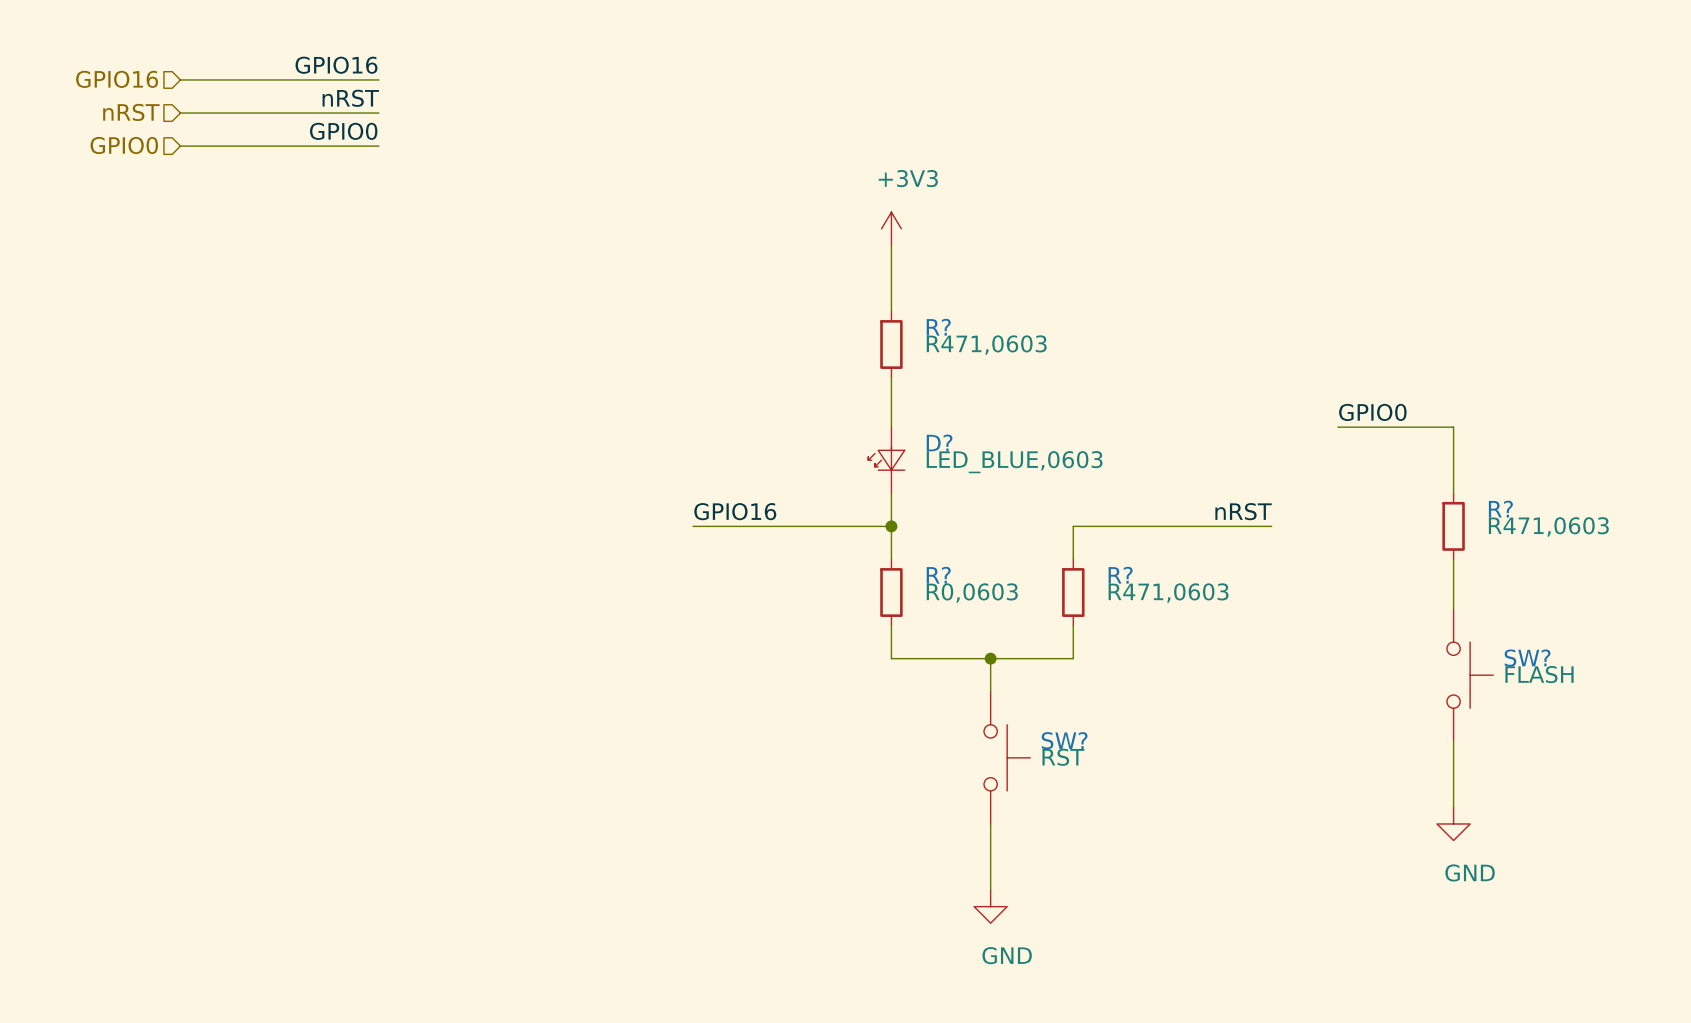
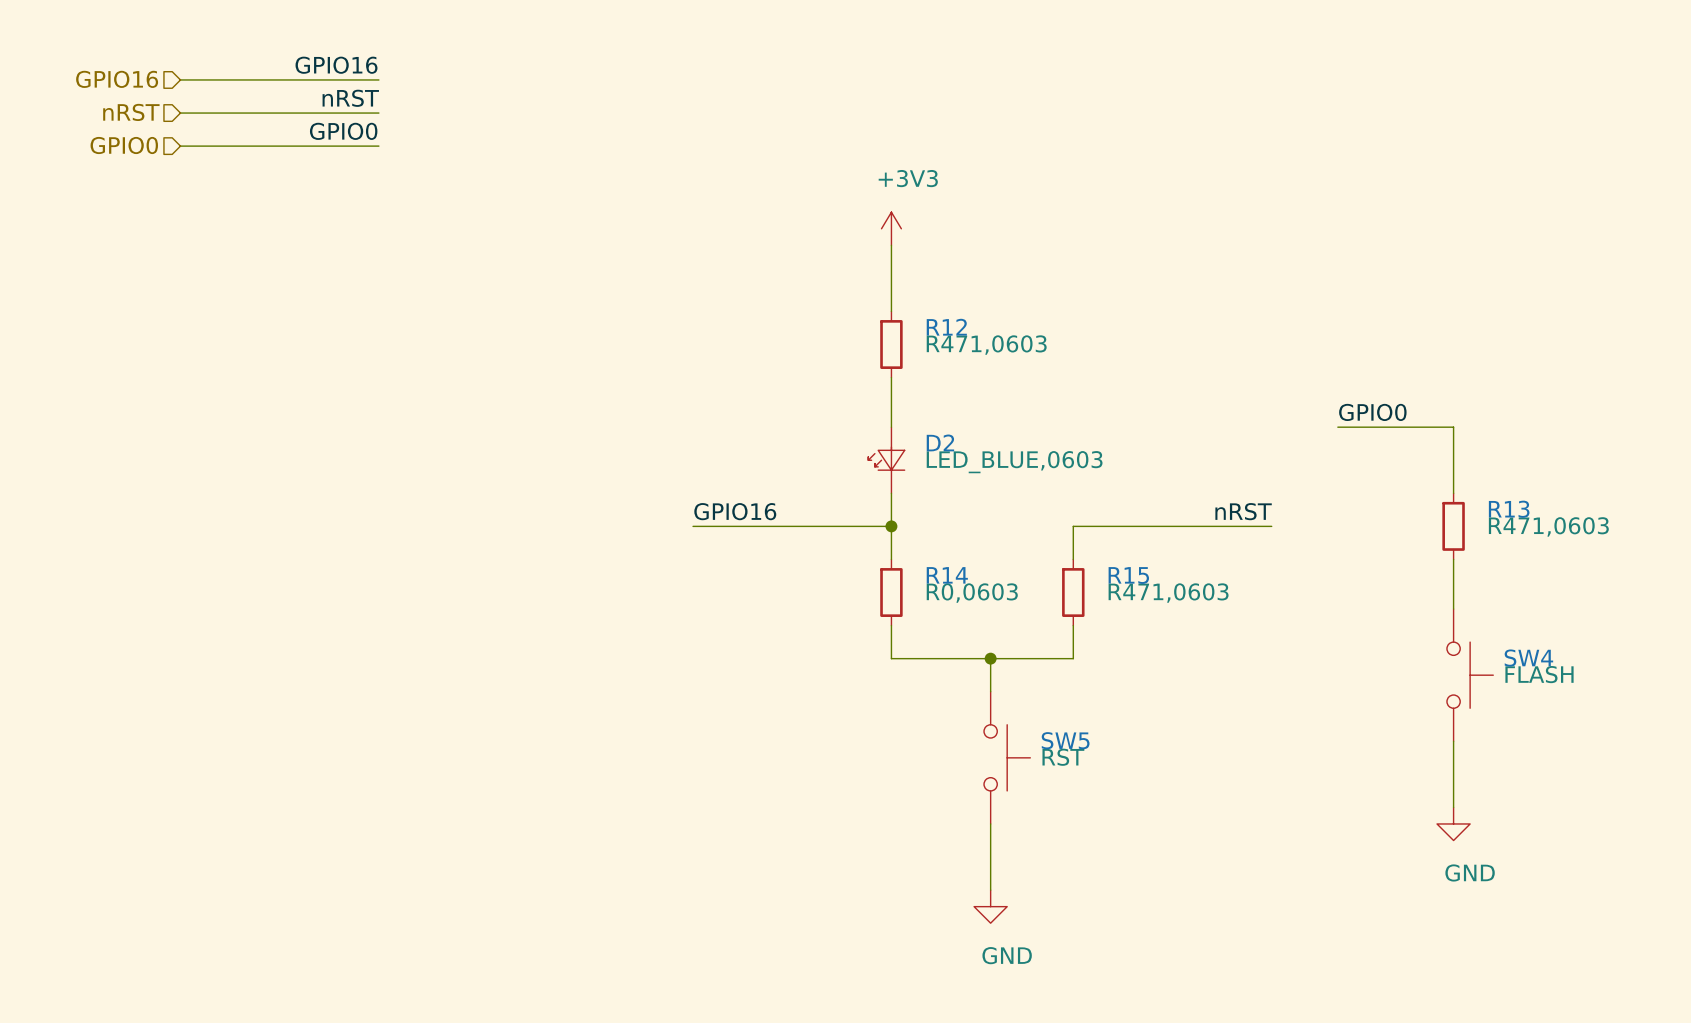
R? name: R? (938, 327) -> R12 (946, 327)
D? name: D? (939, 442) -> D2 (940, 442)
R? name: R? (1500, 509) -> R13 (1509, 509)
R? name: R? (938, 575) -> R14 (947, 575)
R? name: R? (1120, 575) -> R15 (1128, 575)
SW? name: SW? (1527, 658) -> SW4 (1528, 658)
SW? name: SW? (1064, 740) -> SW5 (1065, 740)

